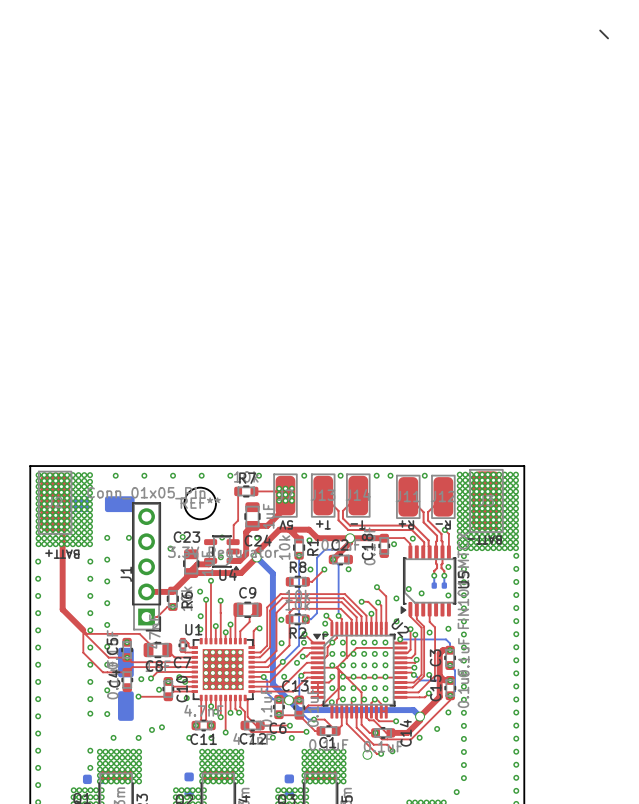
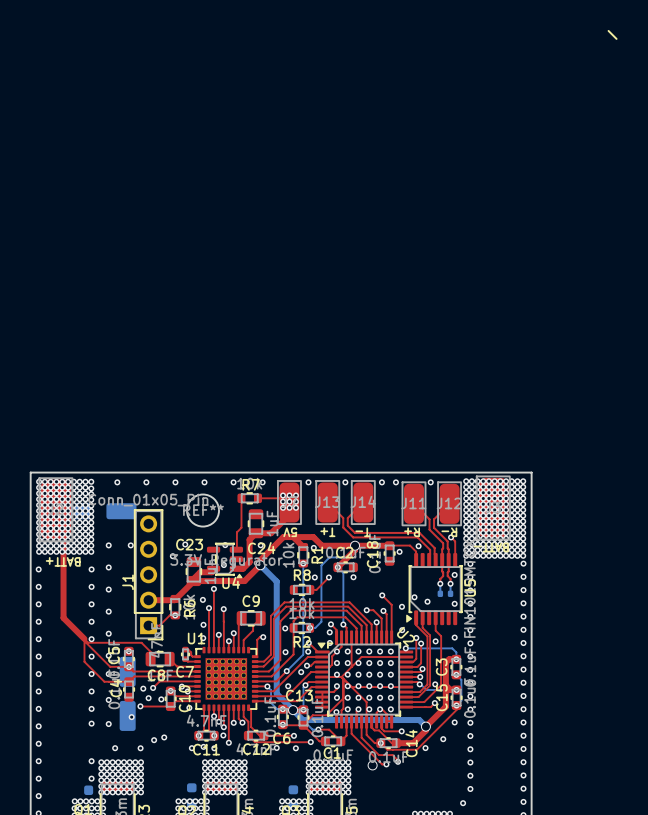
via: none -> (148, 698)
via: none -> (131, 717)
via: none -> (223, 735)
via: none -> (203, 746)

